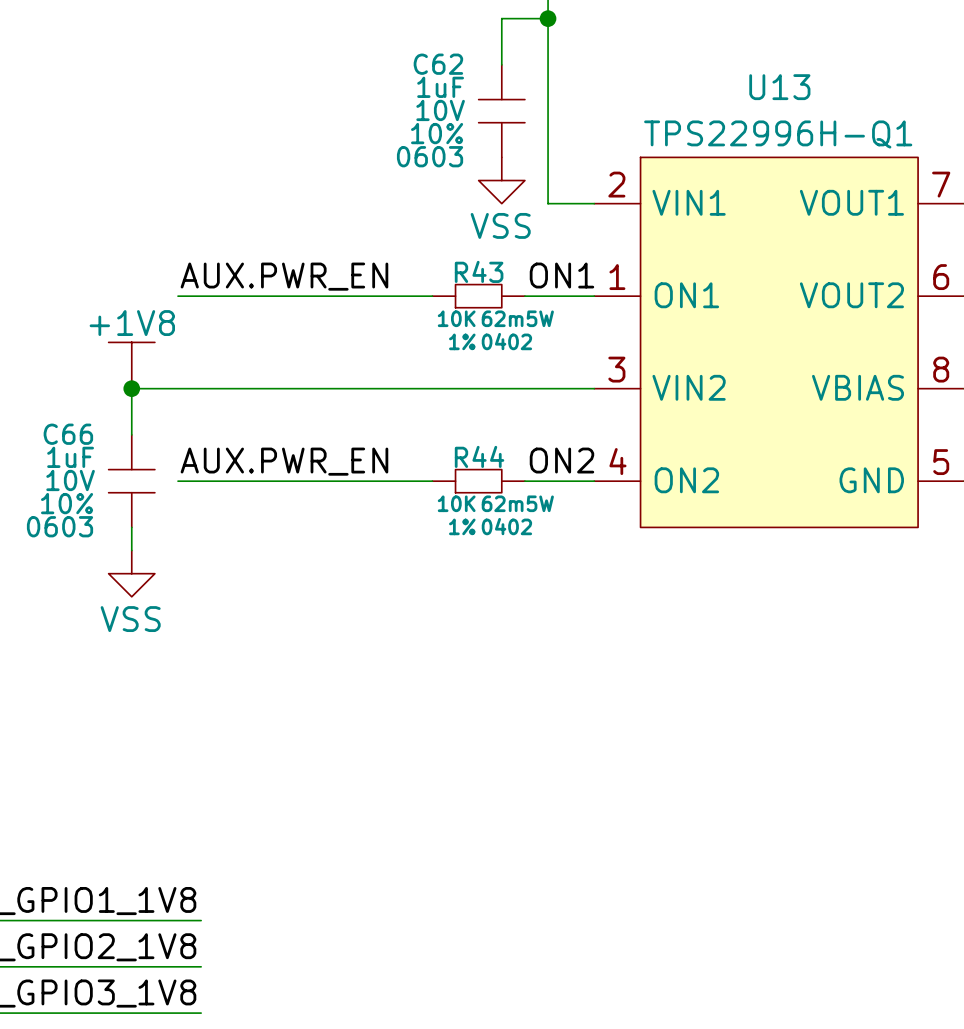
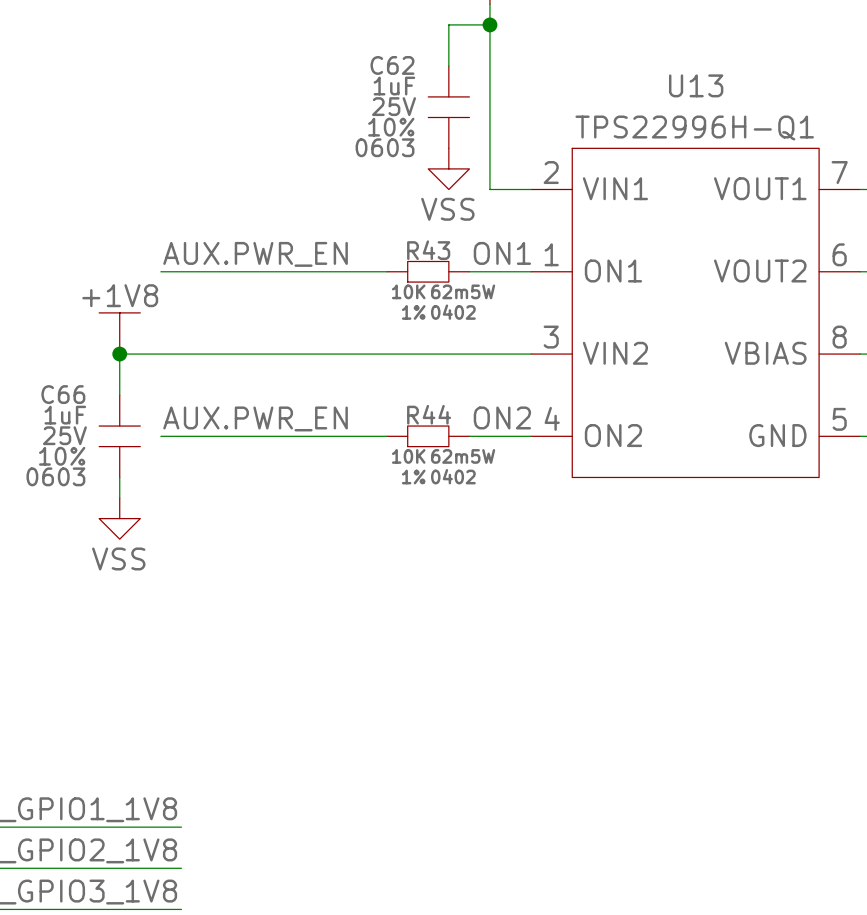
C62 text: 10V (440, 110) -> 25V (394, 106)
C66 text: 10V (70, 480) -> 25V (64, 435)

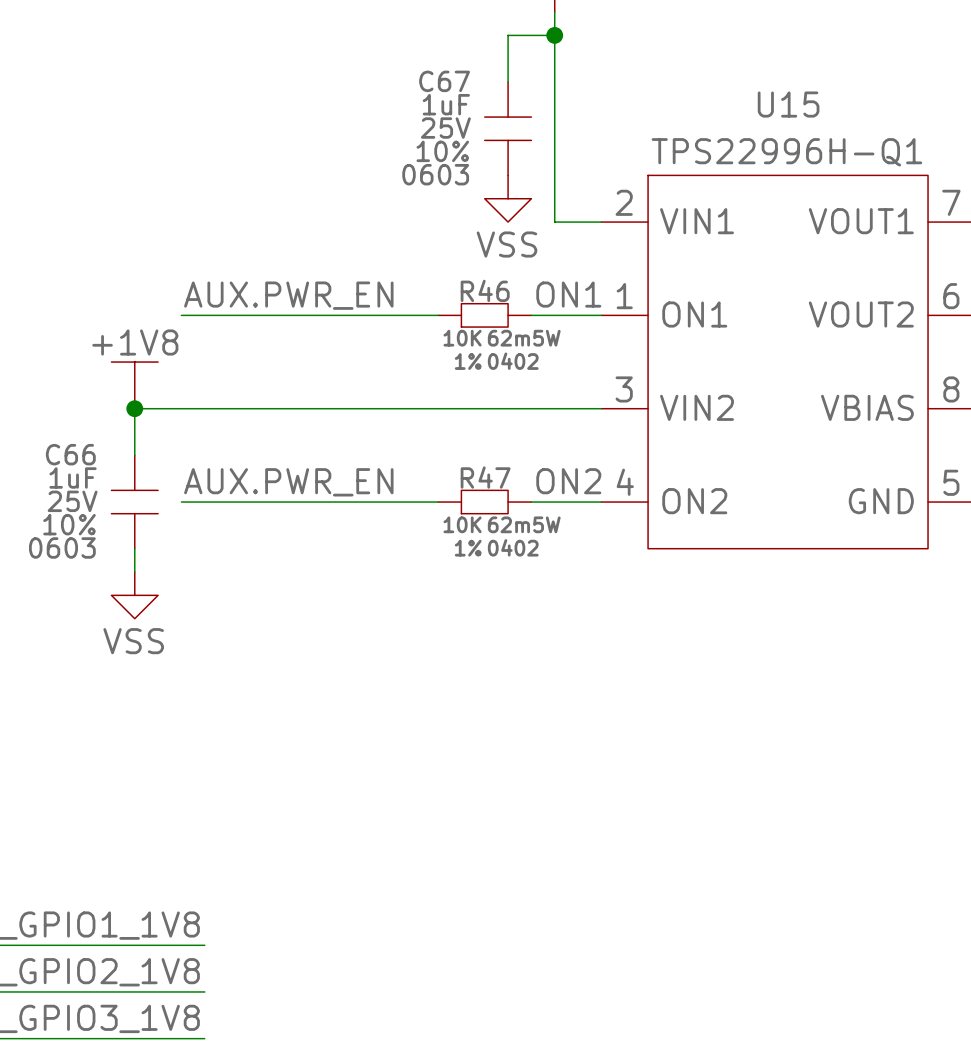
C62 name: C62 (392, 65) -> C67 (444, 81)
U13 name: U13 (696, 85) -> U15 (788, 104)
R43 name: R43 (428, 250) -> R46 (485, 290)
R44 name: R44 (429, 414) -> R47 (485, 477)

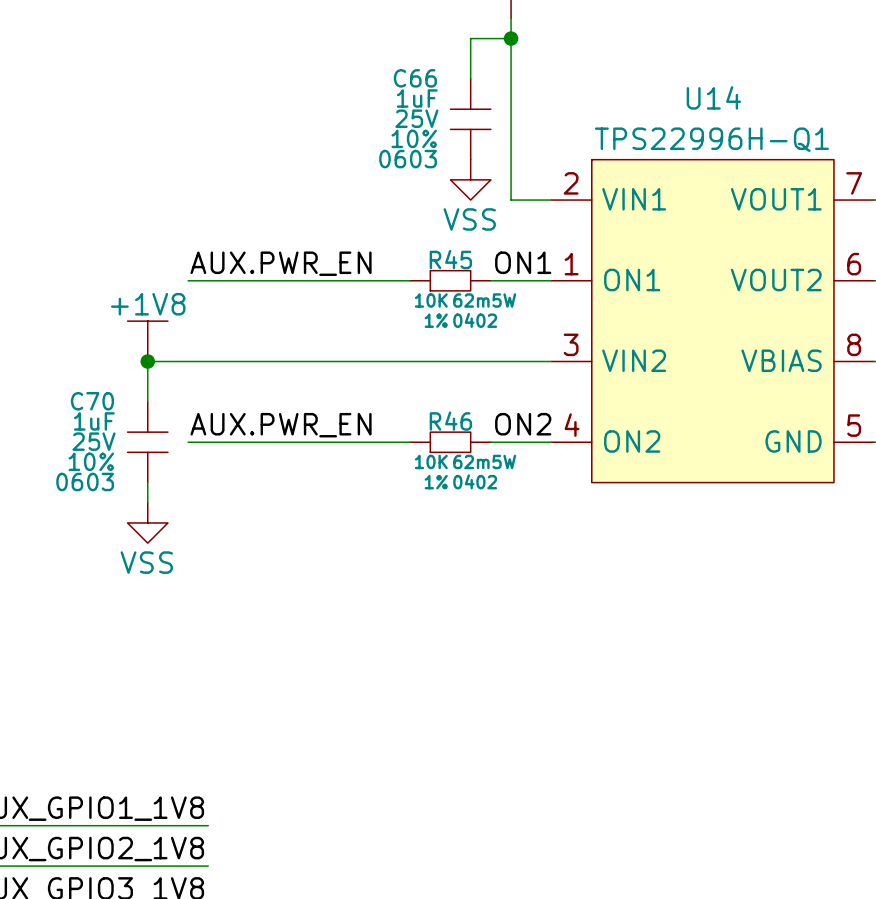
C67 name: C67 (444, 81) -> C66 (415, 78)
U15 name: U15 (788, 104) -> U14 (713, 97)
R46 name: R46 (485, 290) -> R45 (450, 259)
C66 name: C66 (70, 454) -> C70 (92, 401)
R47 name: R47 (485, 477) -> R46 (450, 421)

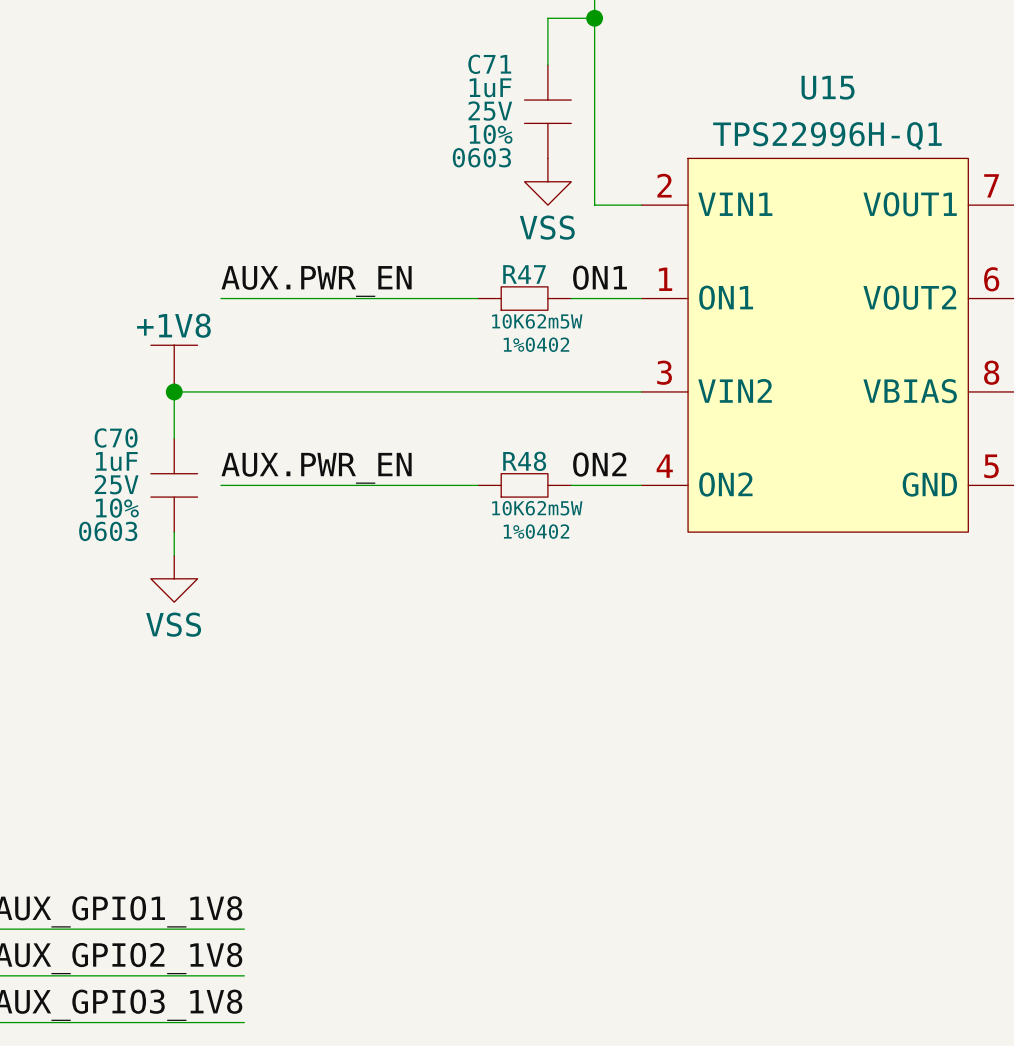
C66 name: C66 (415, 78) -> C71 (489, 64)
U14 name: U14 (713, 97) -> U15 (828, 87)
R45 name: R45 (450, 259) -> R47 (524, 274)
R46 name: R46 (450, 421) -> R48 (524, 461)

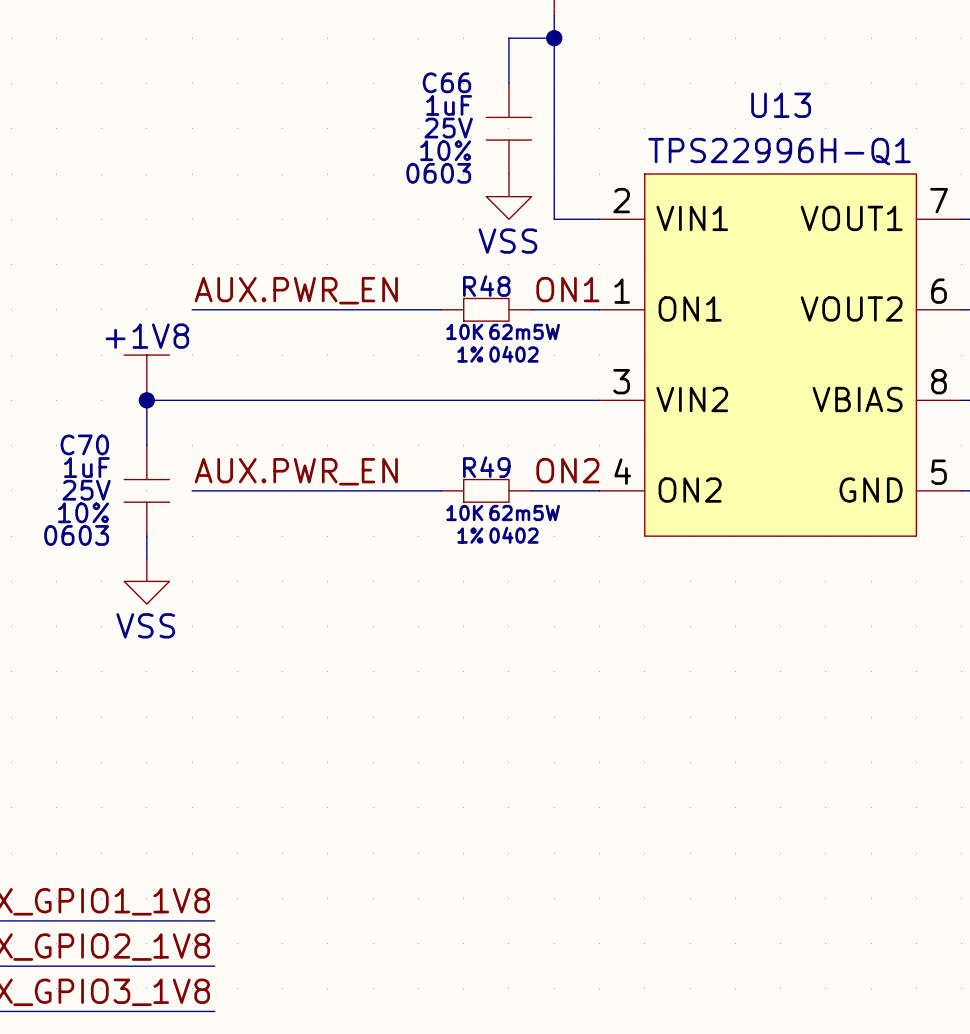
C71 name: C71 (489, 64) -> C66 (446, 82)
U15 name: U15 (828, 87) -> U13 (781, 105)
R47 name: R47 (524, 274) -> R48 (486, 286)
R48 name: R48 (524, 461) -> R49 (486, 467)

